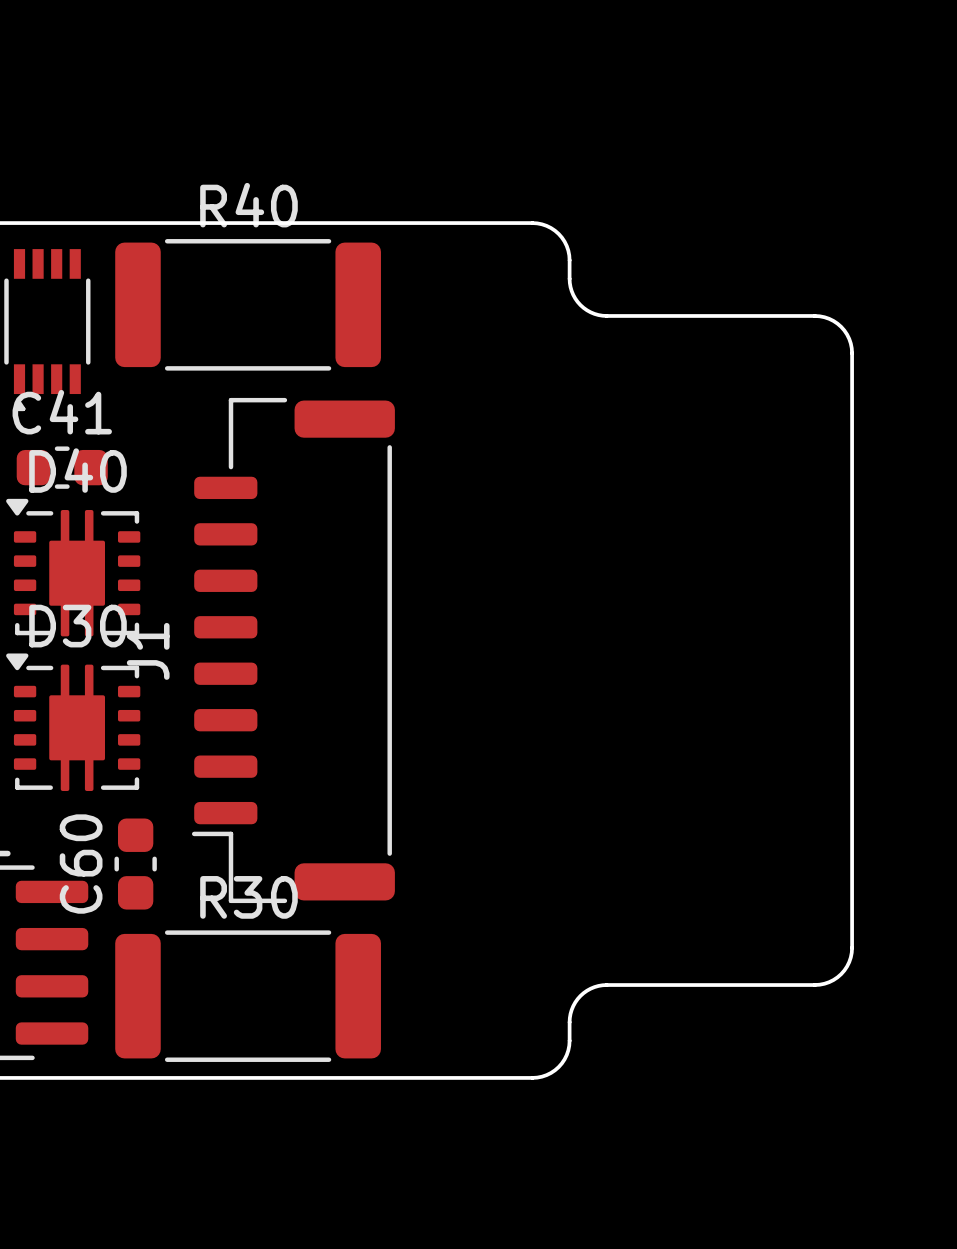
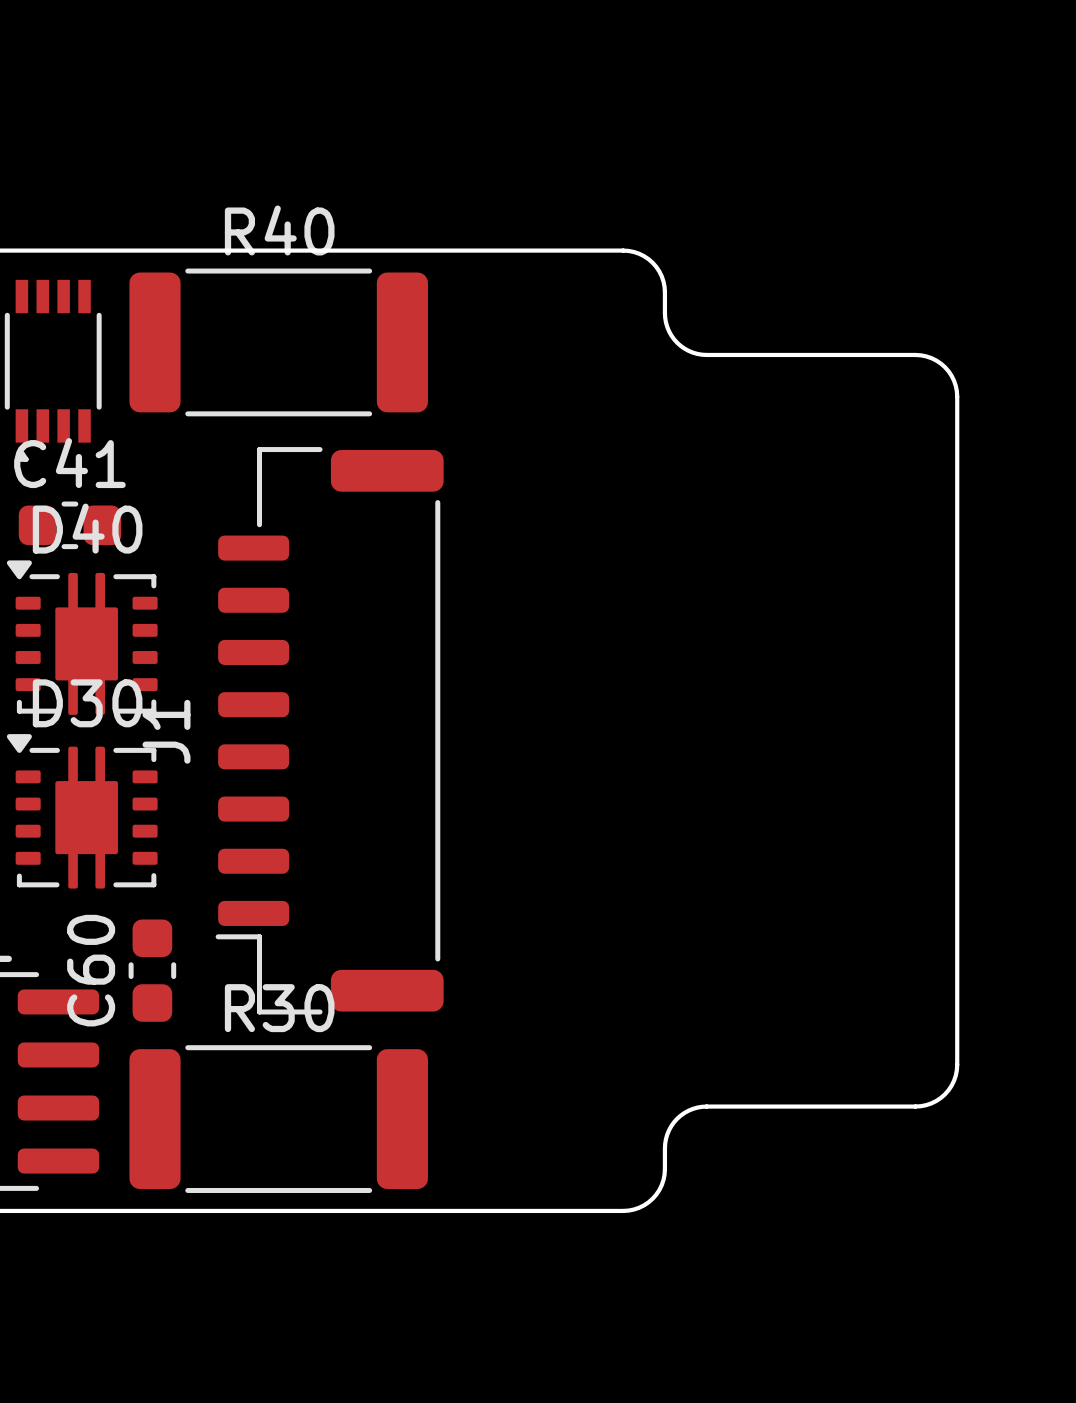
board edge: (532, 223) (551, 228) (564, 241) (569, 255) (570, 287) (580, 305) (598, 315) (629, 315) -> (598, 250) (633, 252) (652, 262) (663, 281) (665, 317) (671, 335) (684, 348) (692, 352) (706, 354)
board edge: (629, 985) (598, 985) (580, 995) (570, 1013) (569, 1045) (564, 1059) (551, 1072) (532, 1077) -> (706, 1106) (692, 1108) (684, 1112) (671, 1126) (665, 1143) (663, 1179) (652, 1198) (633, 1209) (598, 1210)

